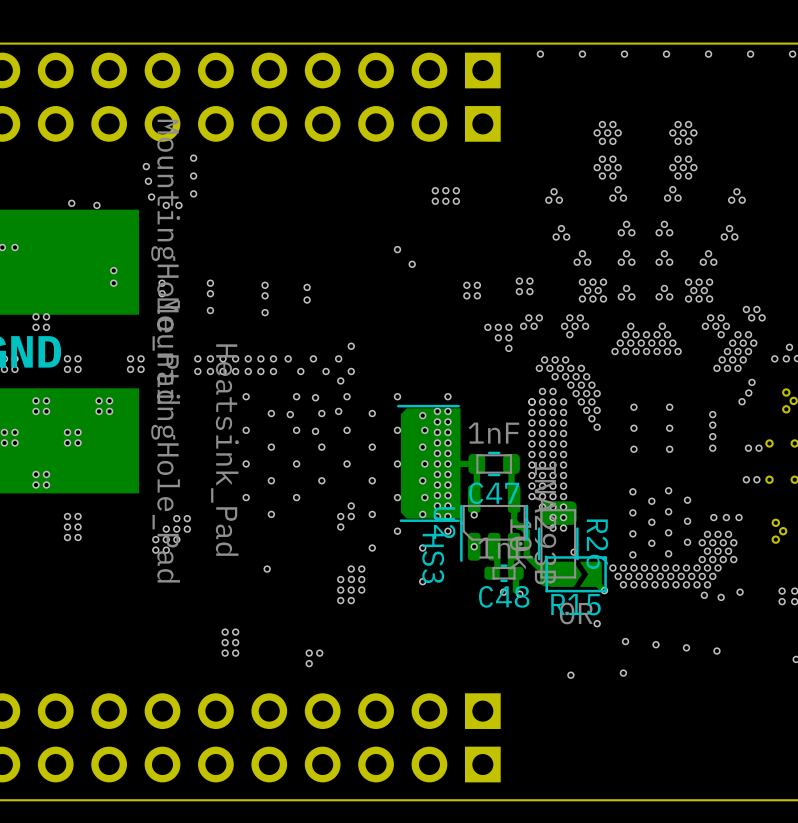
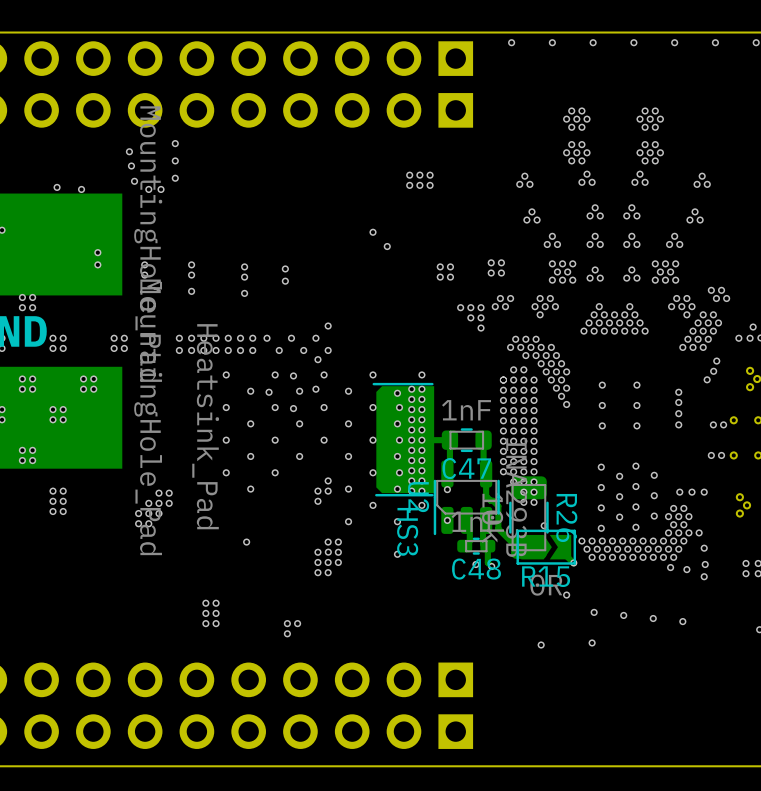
via: (728, 534) -> none
via: (733, 542) -> none
via: (728, 551) -> none
via: none -> (704, 548)
via: none -> (704, 576)

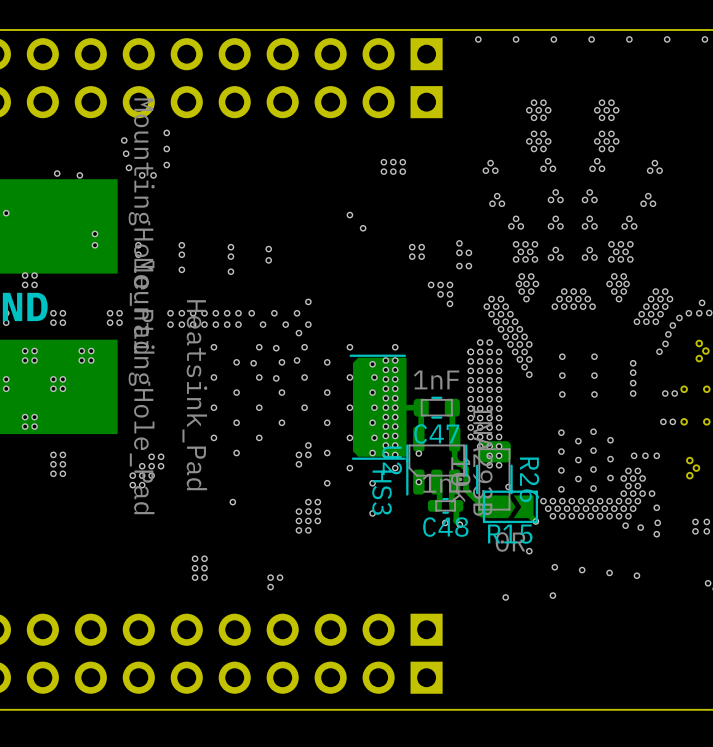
via: (501, 262) -> none
via: none -> (459, 266)
via: none -> (468, 266)
via: (711, 290) -> none
via: (721, 290) -> none
via: (500, 298) -> none
via: (510, 298) -> none
via: (540, 298) -> none
via: (550, 298) -> none
via: none -> (521, 276)
via: none -> (531, 276)
via: none -> (614, 276)
via: none -> (623, 276)
via: (676, 298) -> none
via: (686, 298) -> none
via: (716, 298) -> none
via: (726, 298) -> none
via: (495, 306) -> none
via: (505, 306) -> none
via: (535, 306) -> none
via: (545, 306) -> none
via: none -> (526, 283)
via: none -> (535, 283)
via: (599, 306) -> none
via: (629, 306) -> none
via: none -> (609, 283)
via: none -> (619, 283)
via: (681, 306) -> none
via: (691, 306) -> none
via: (540, 314) -> none
via: none -> (521, 291)
via: none -> (531, 291)
via: (594, 314) -> none
via: (634, 314) -> none
via: none -> (614, 291)
via: none -> (623, 291)
via: (686, 314) -> none
via: none -> (491, 299)
via: none -> (500, 299)
via: none -> (526, 299)
via: (589, 322) -> none
via: (640, 322) -> none
via: none -> (619, 299)
via: none -> (486, 306)
via: none -> (496, 306)
via: none -> (505, 306)
via: (583, 331) -> none
via: (645, 331) -> none
via: (515, 339) -> none
via: none -> (510, 314)
via: none -> (679, 317)
via: (510, 347) -> none
via: (520, 347) -> none
via: none -> (672, 325)
via: (525, 355) -> none

